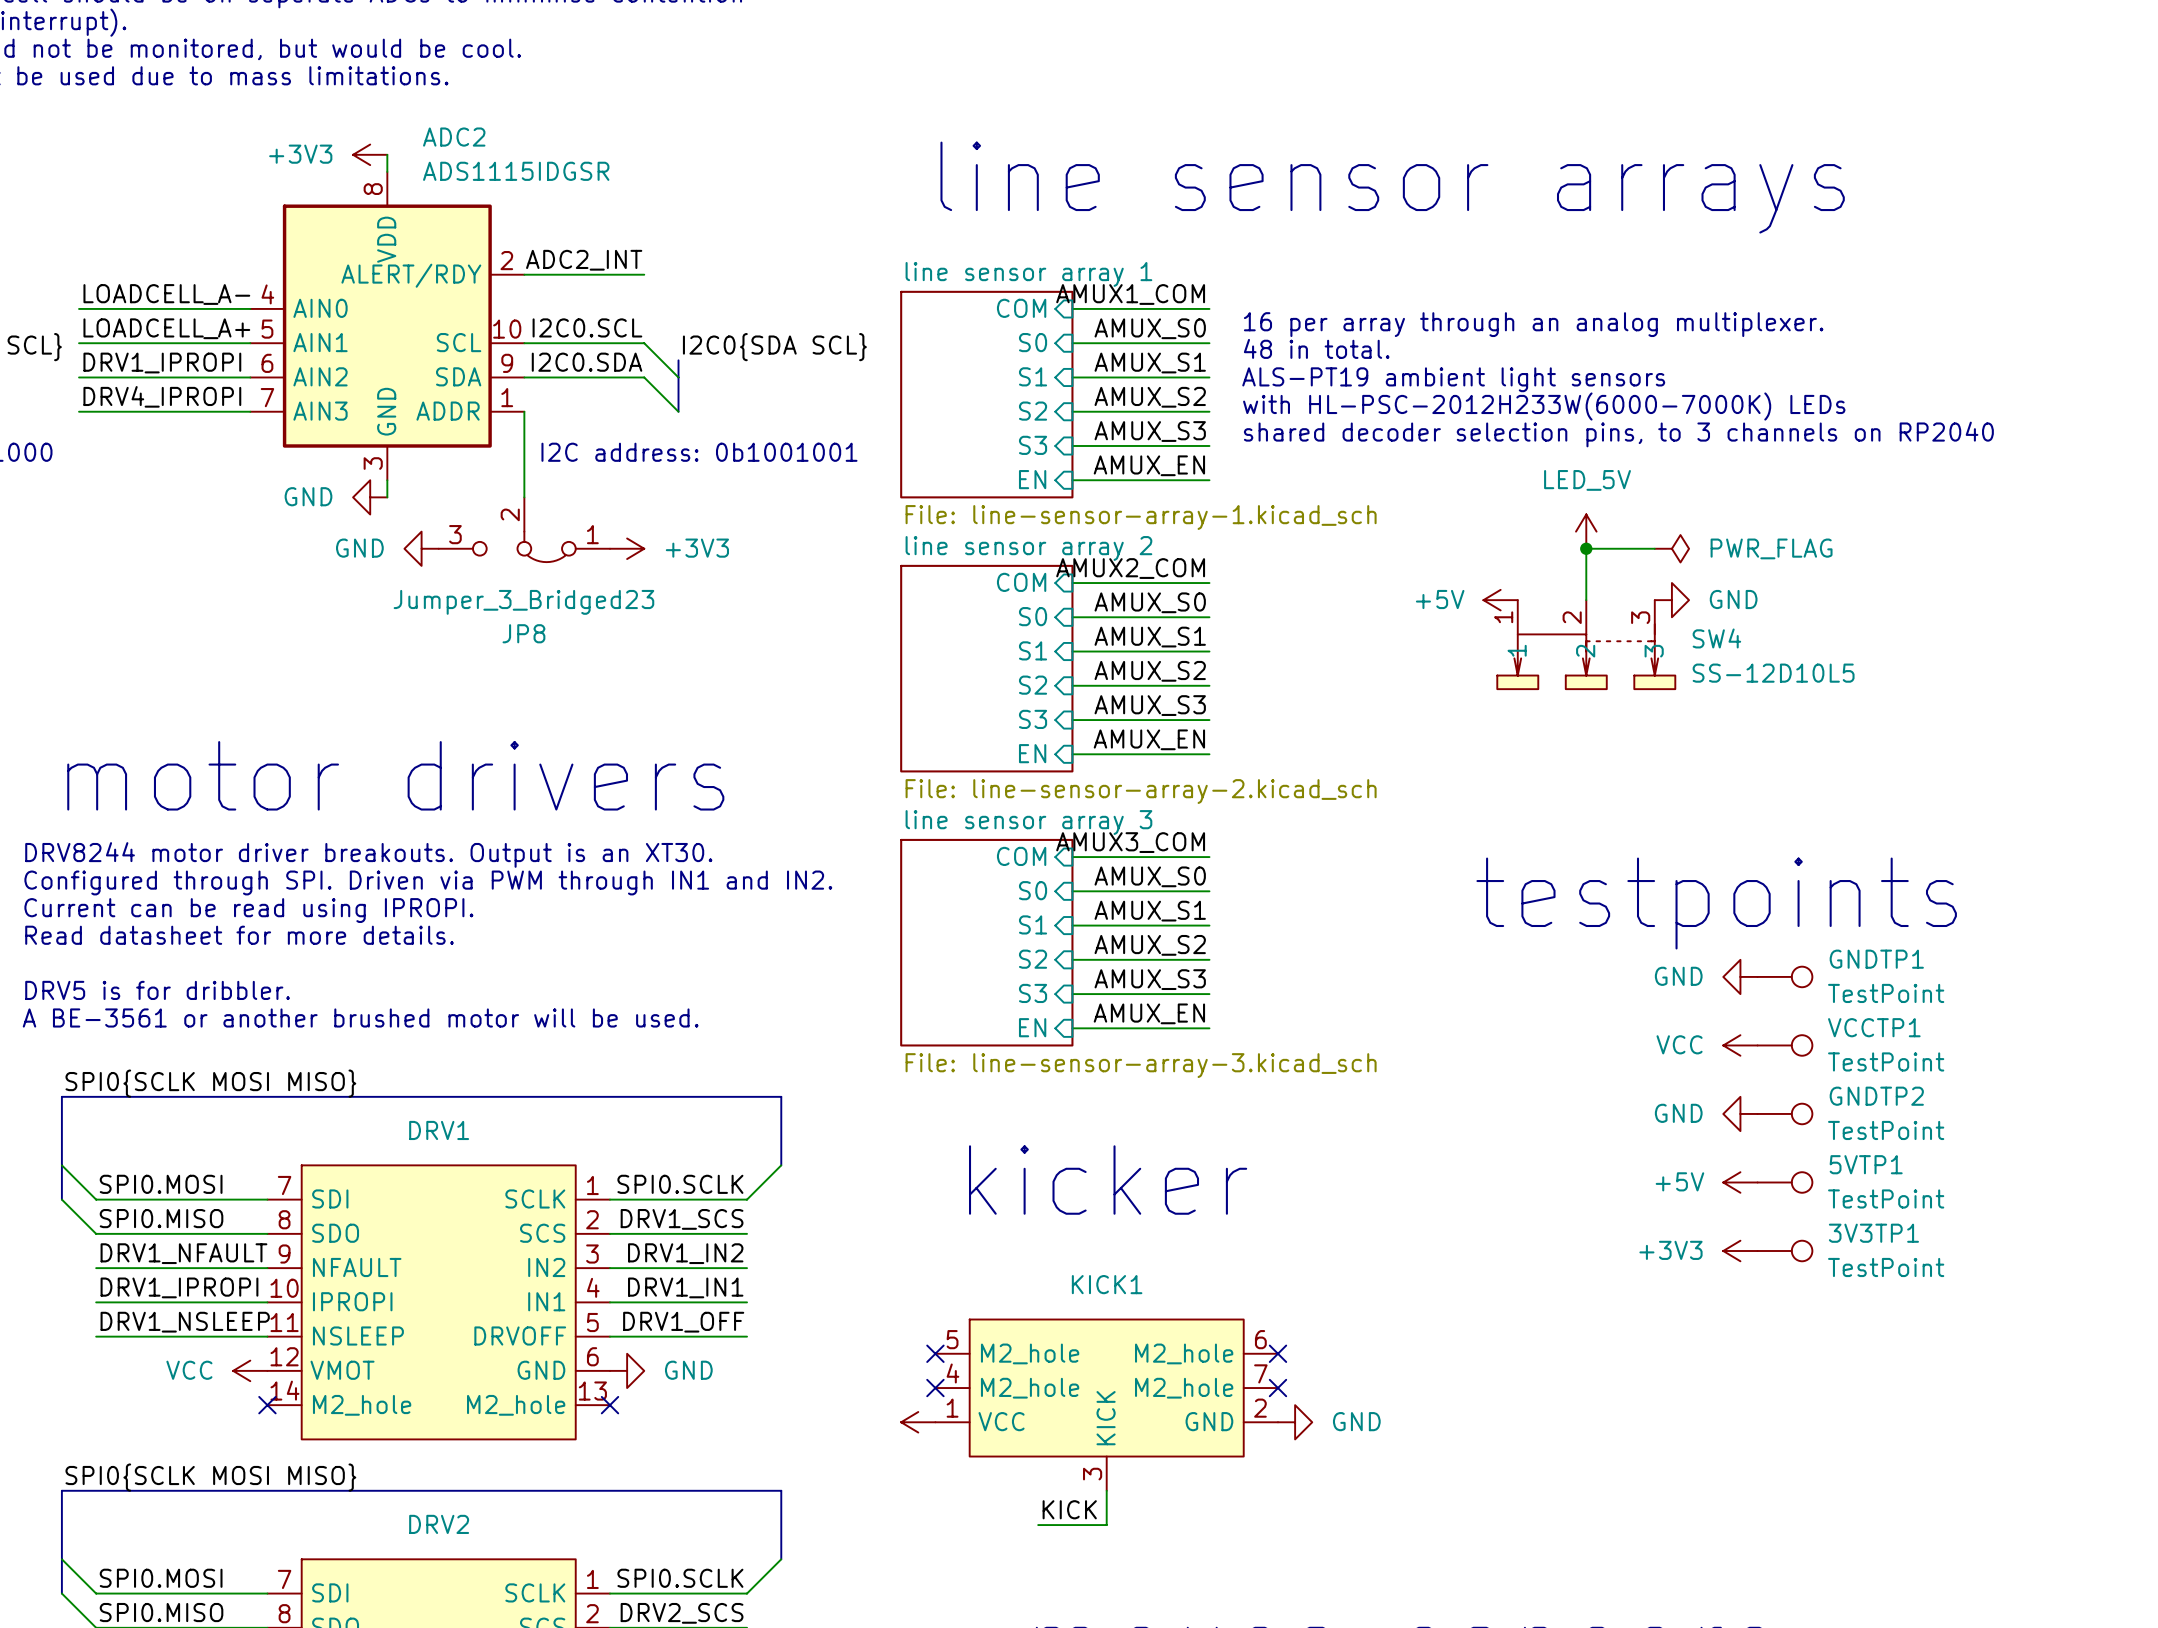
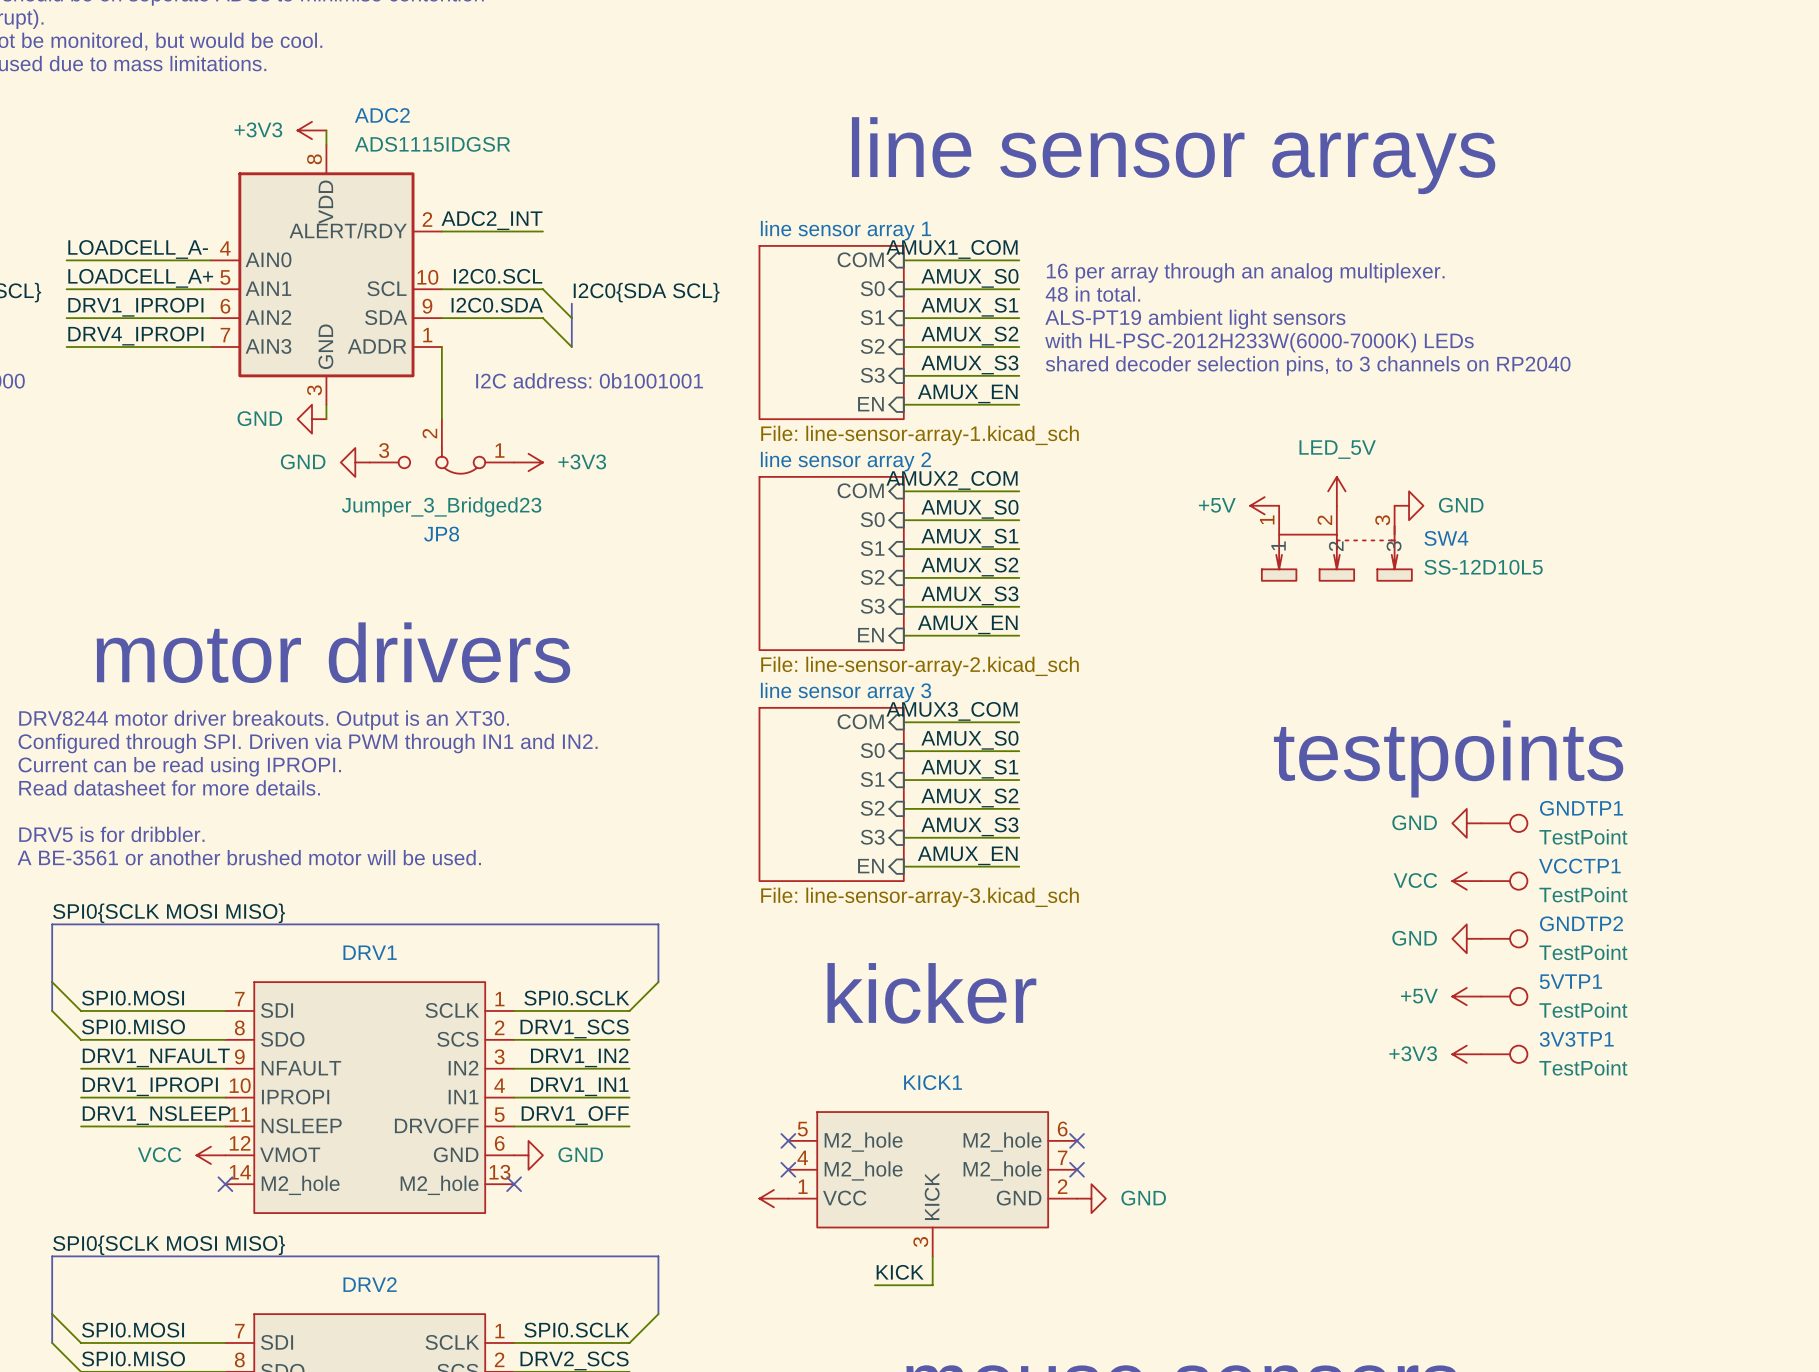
power symbol position: LED_5V (1586, 531) -> LED_5V (1336, 491)
junction: (1586, 548) -> none
wire: (1654, 548) (1586, 548) (1586, 600) -> none
power symbol: PWR_FLAG (1671, 548) -> none

